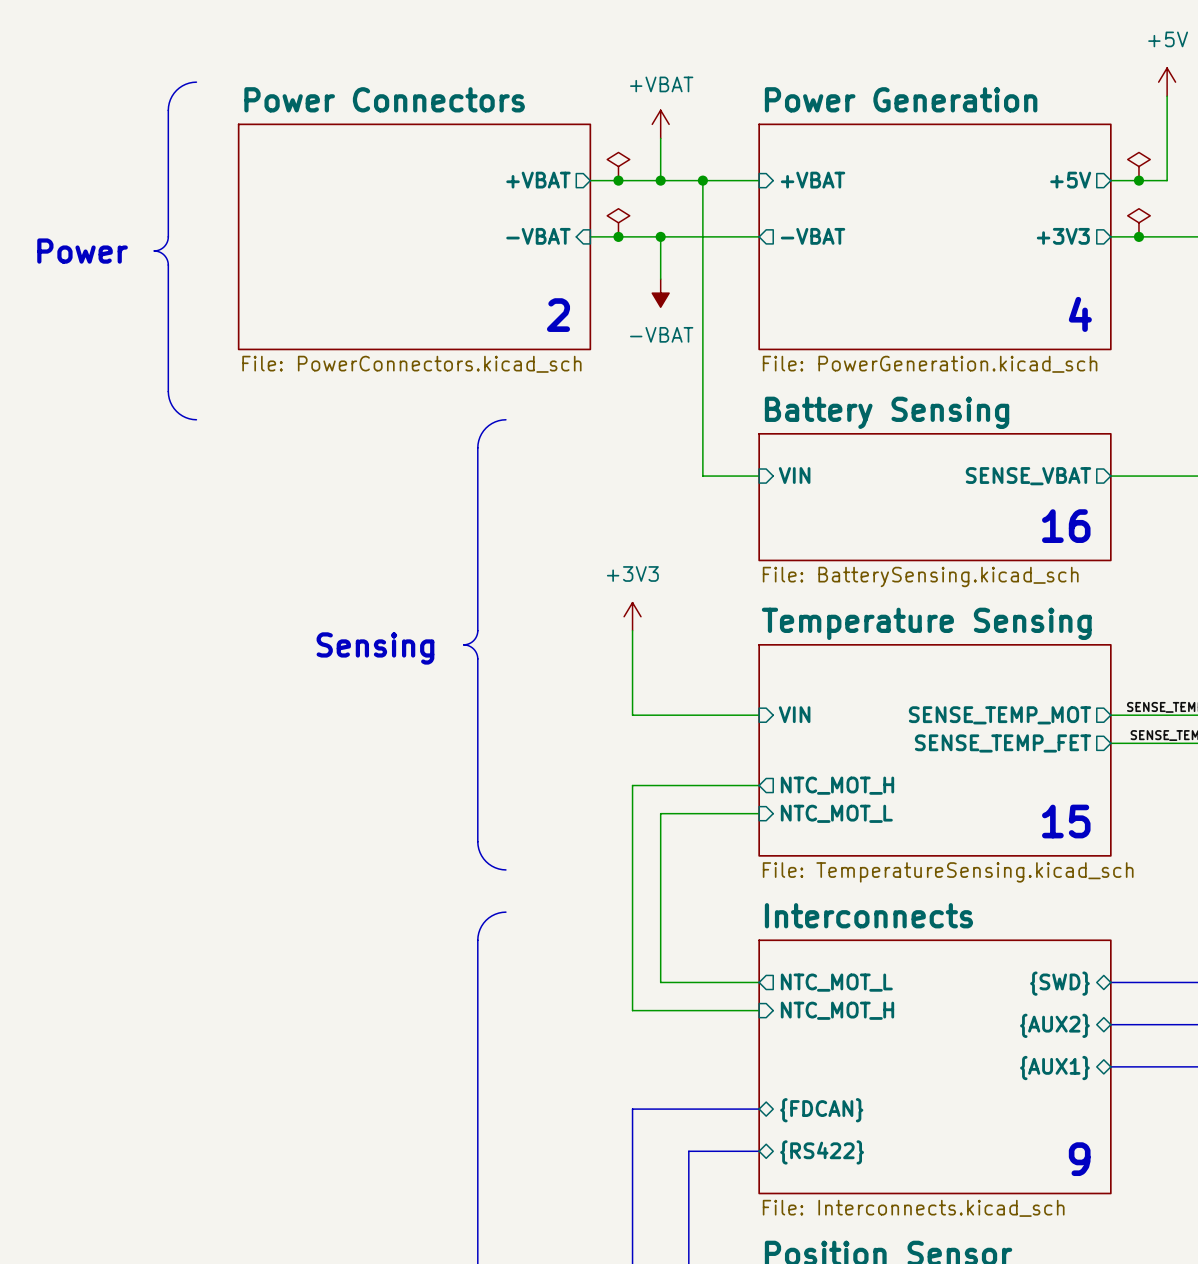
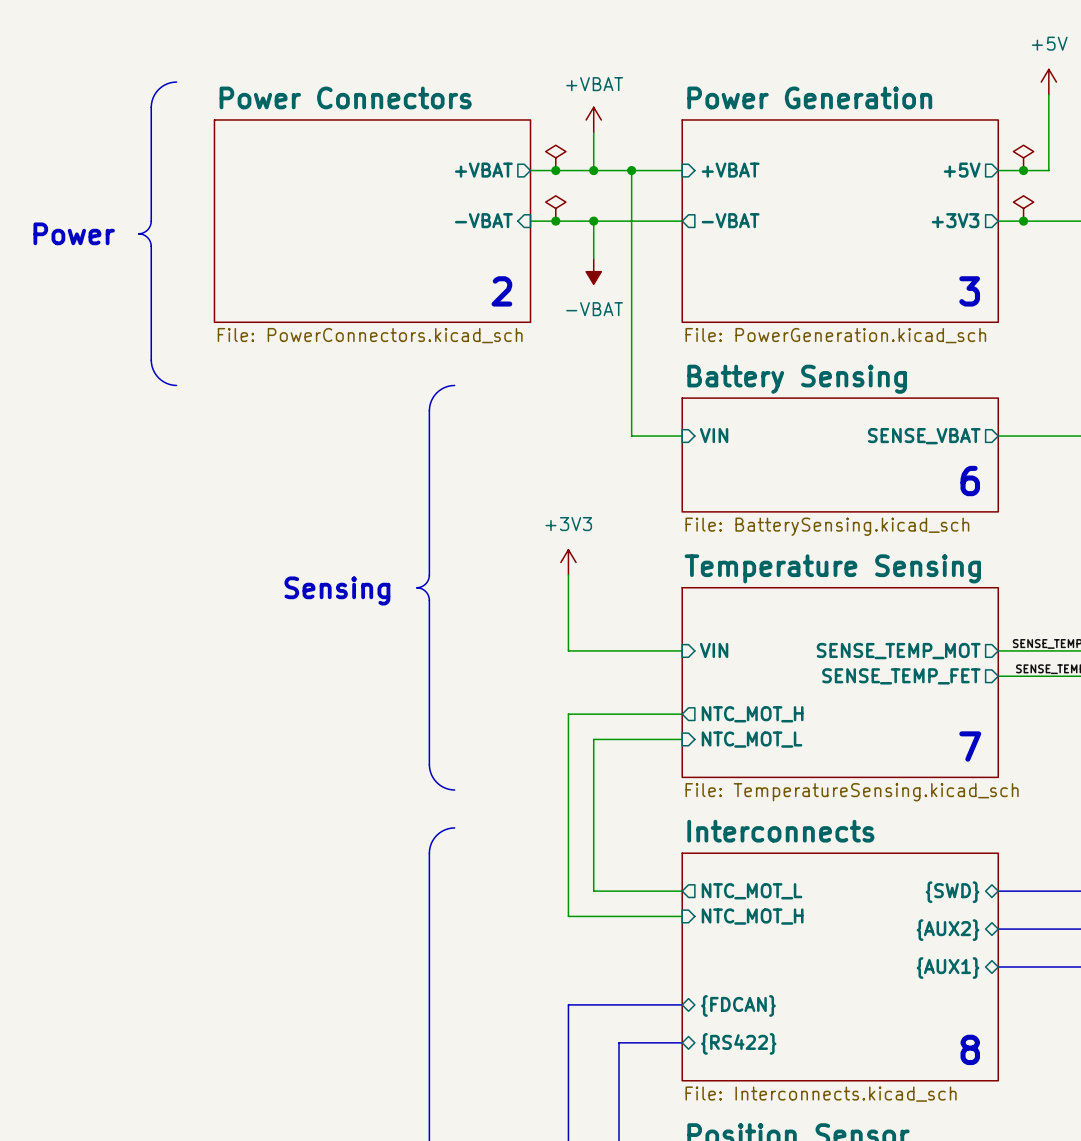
text: 4 (1080, 314) -> 3 (969, 291)
text: 16 (1066, 526) -> 6 (970, 481)
text: 15 (1066, 821) -> 7 (970, 746)
text: 9 (1079, 1159) -> 8 (970, 1049)

